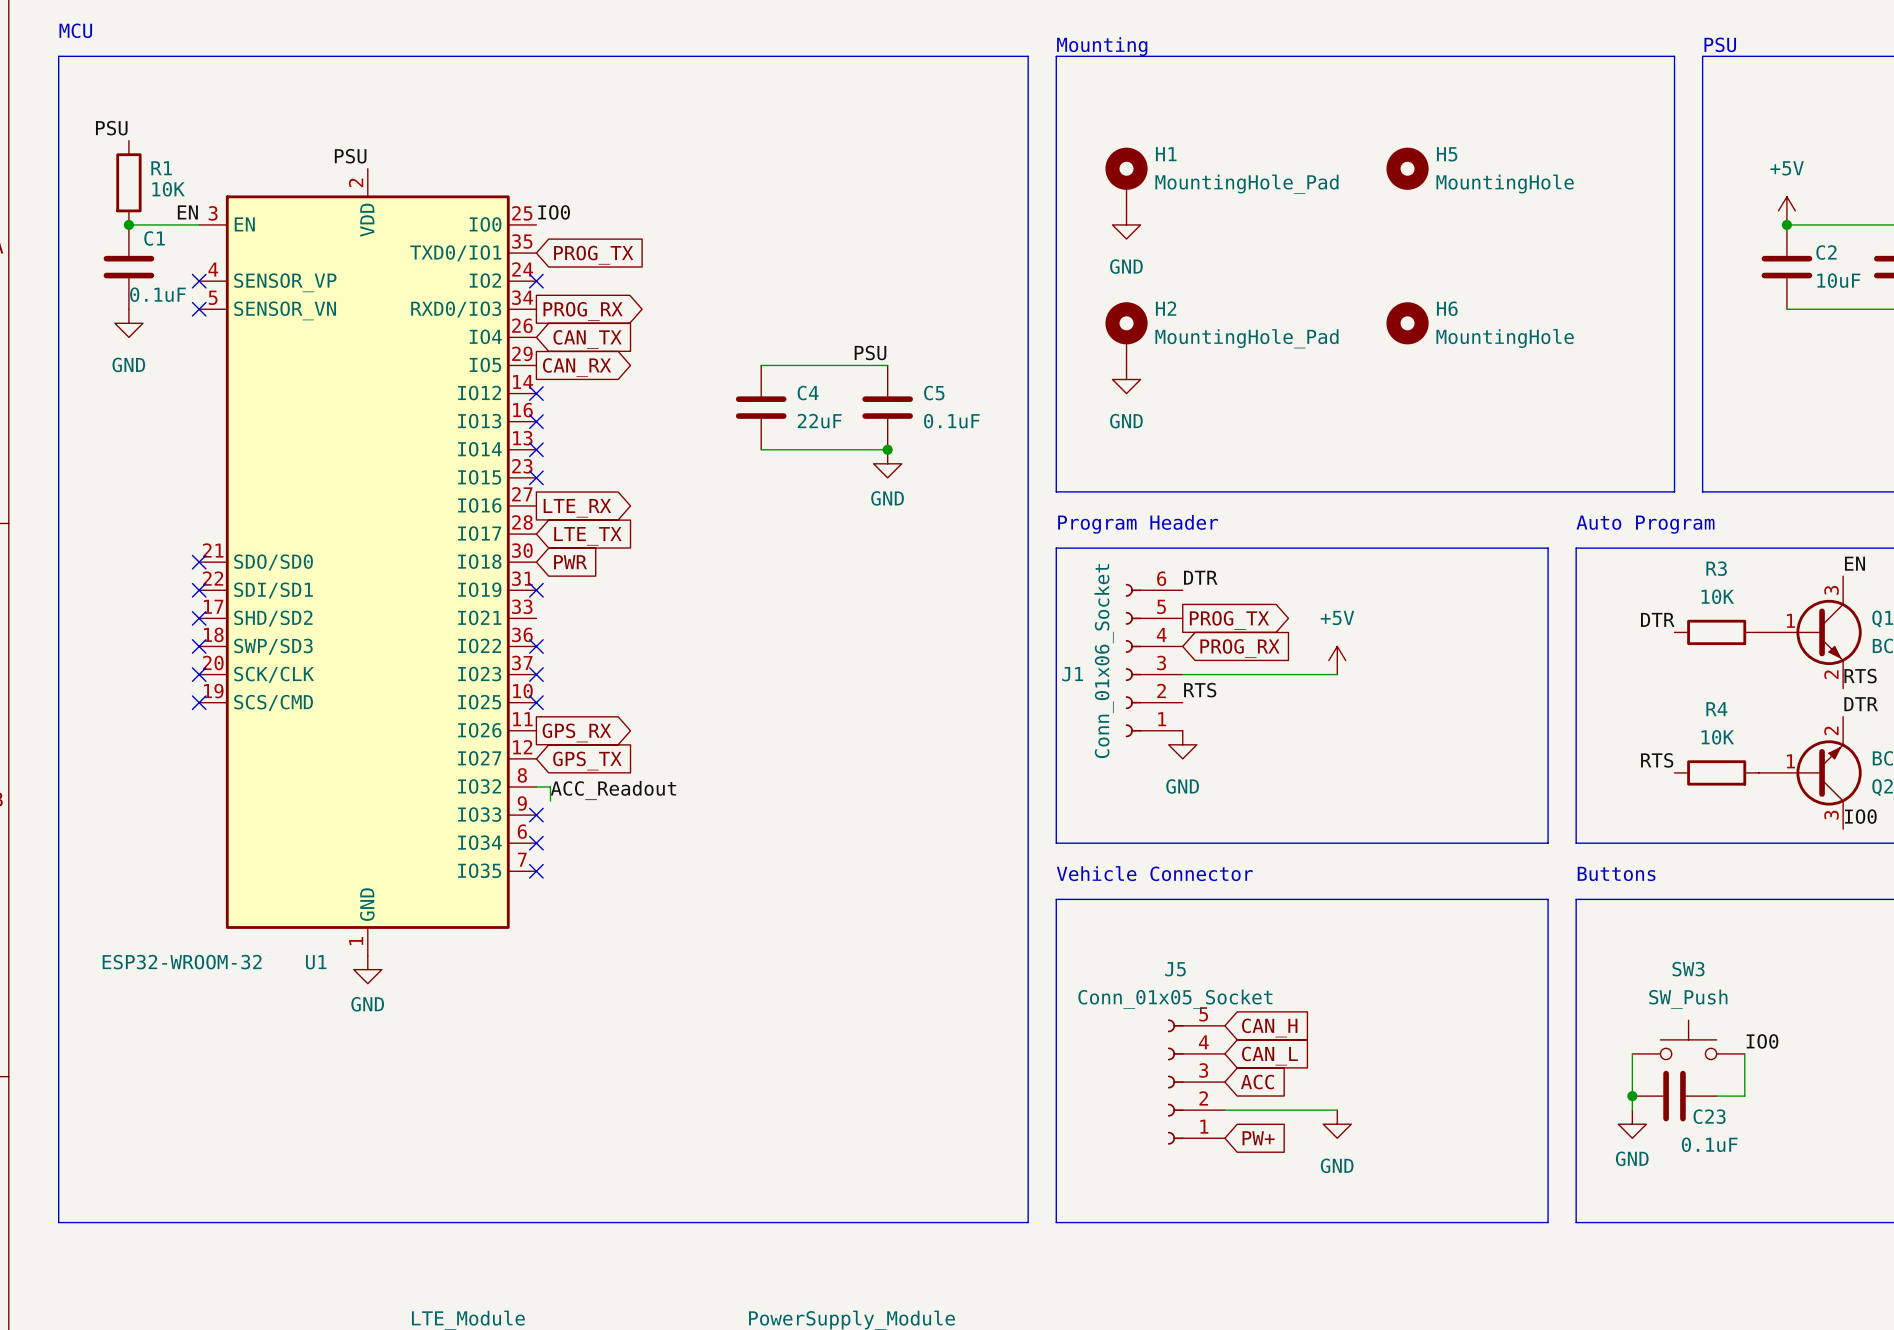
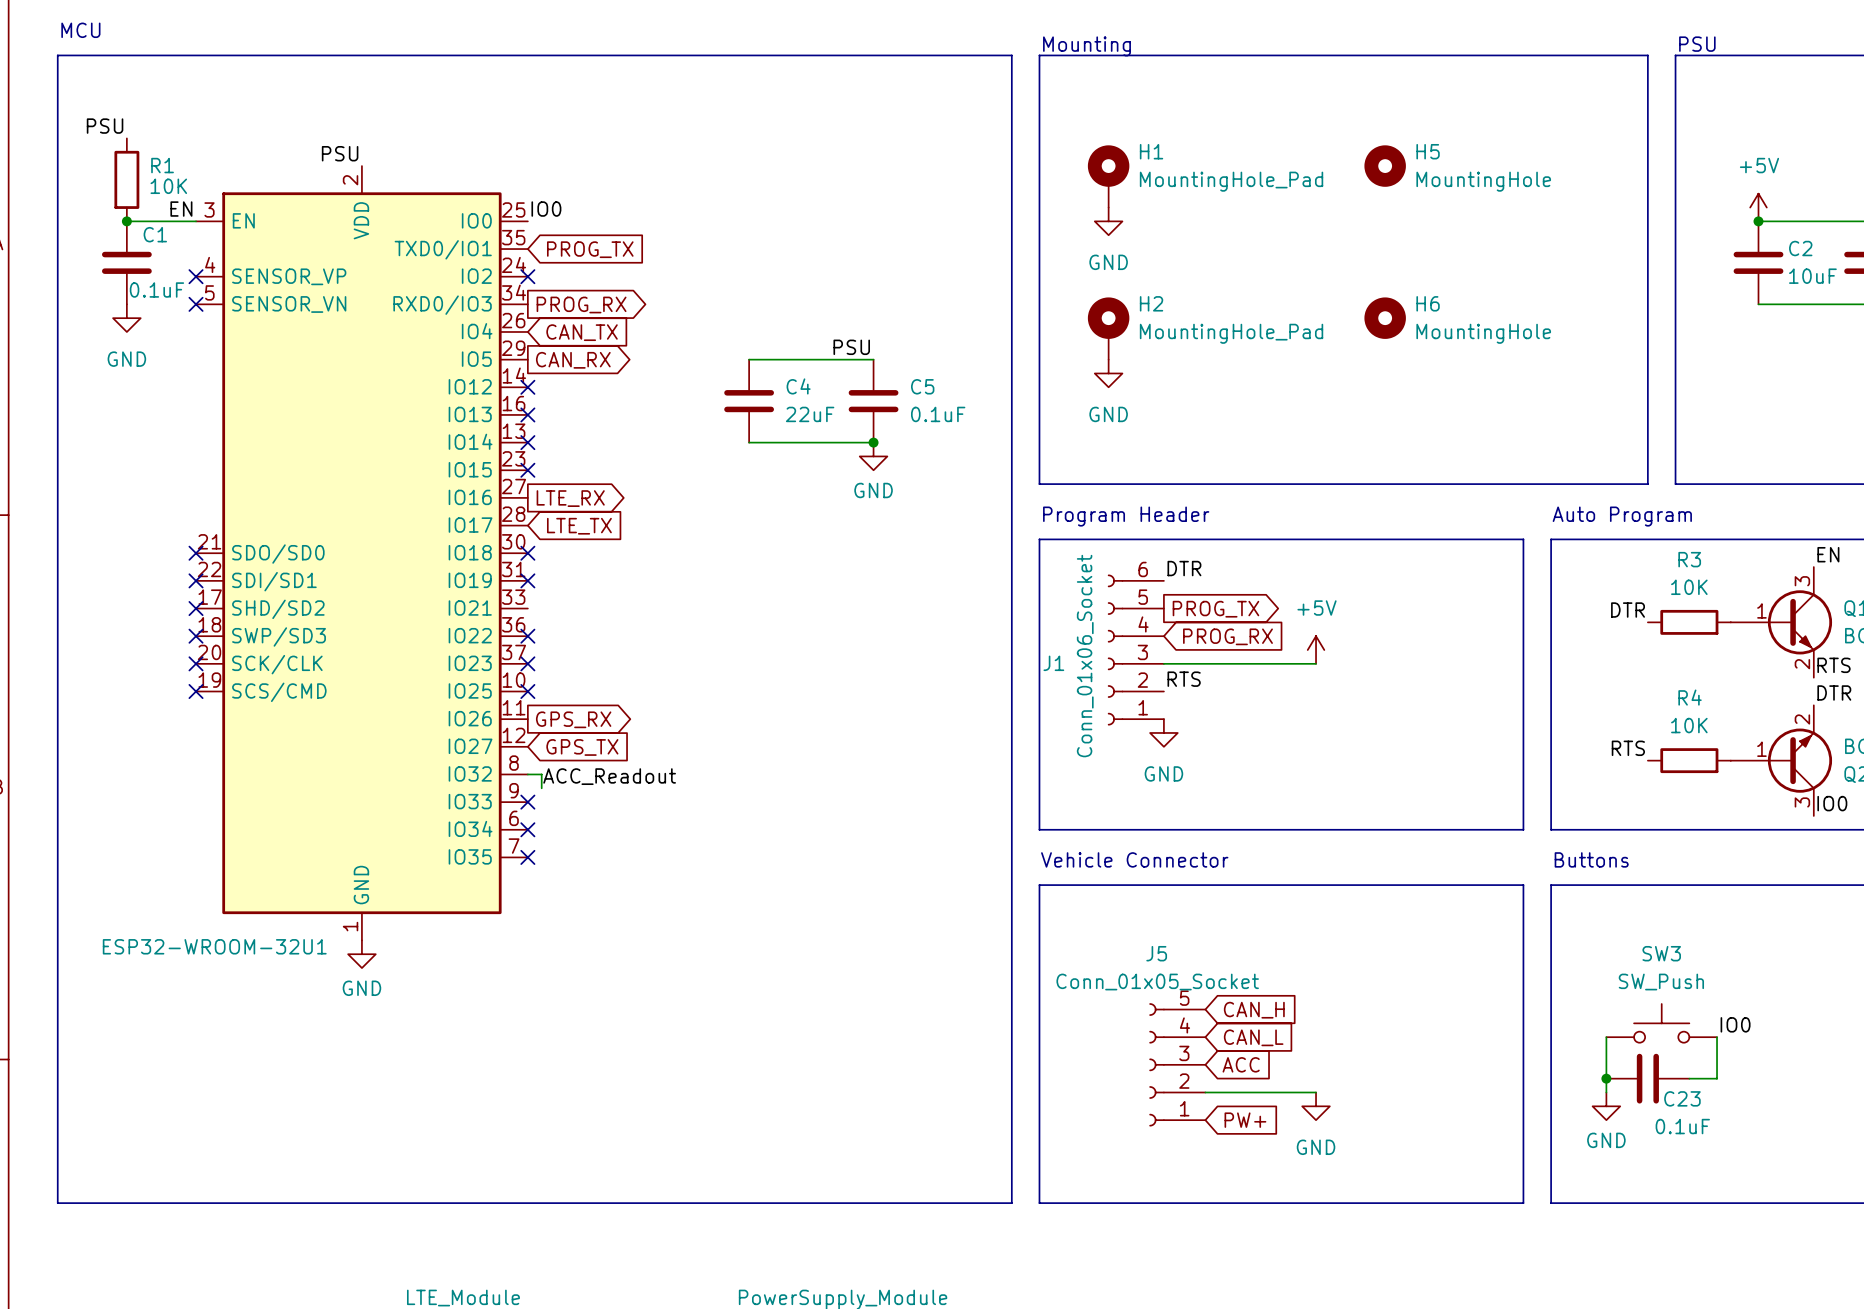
no-connect mark: none -> (527, 553)
global label: PWR (570, 562) -> none

